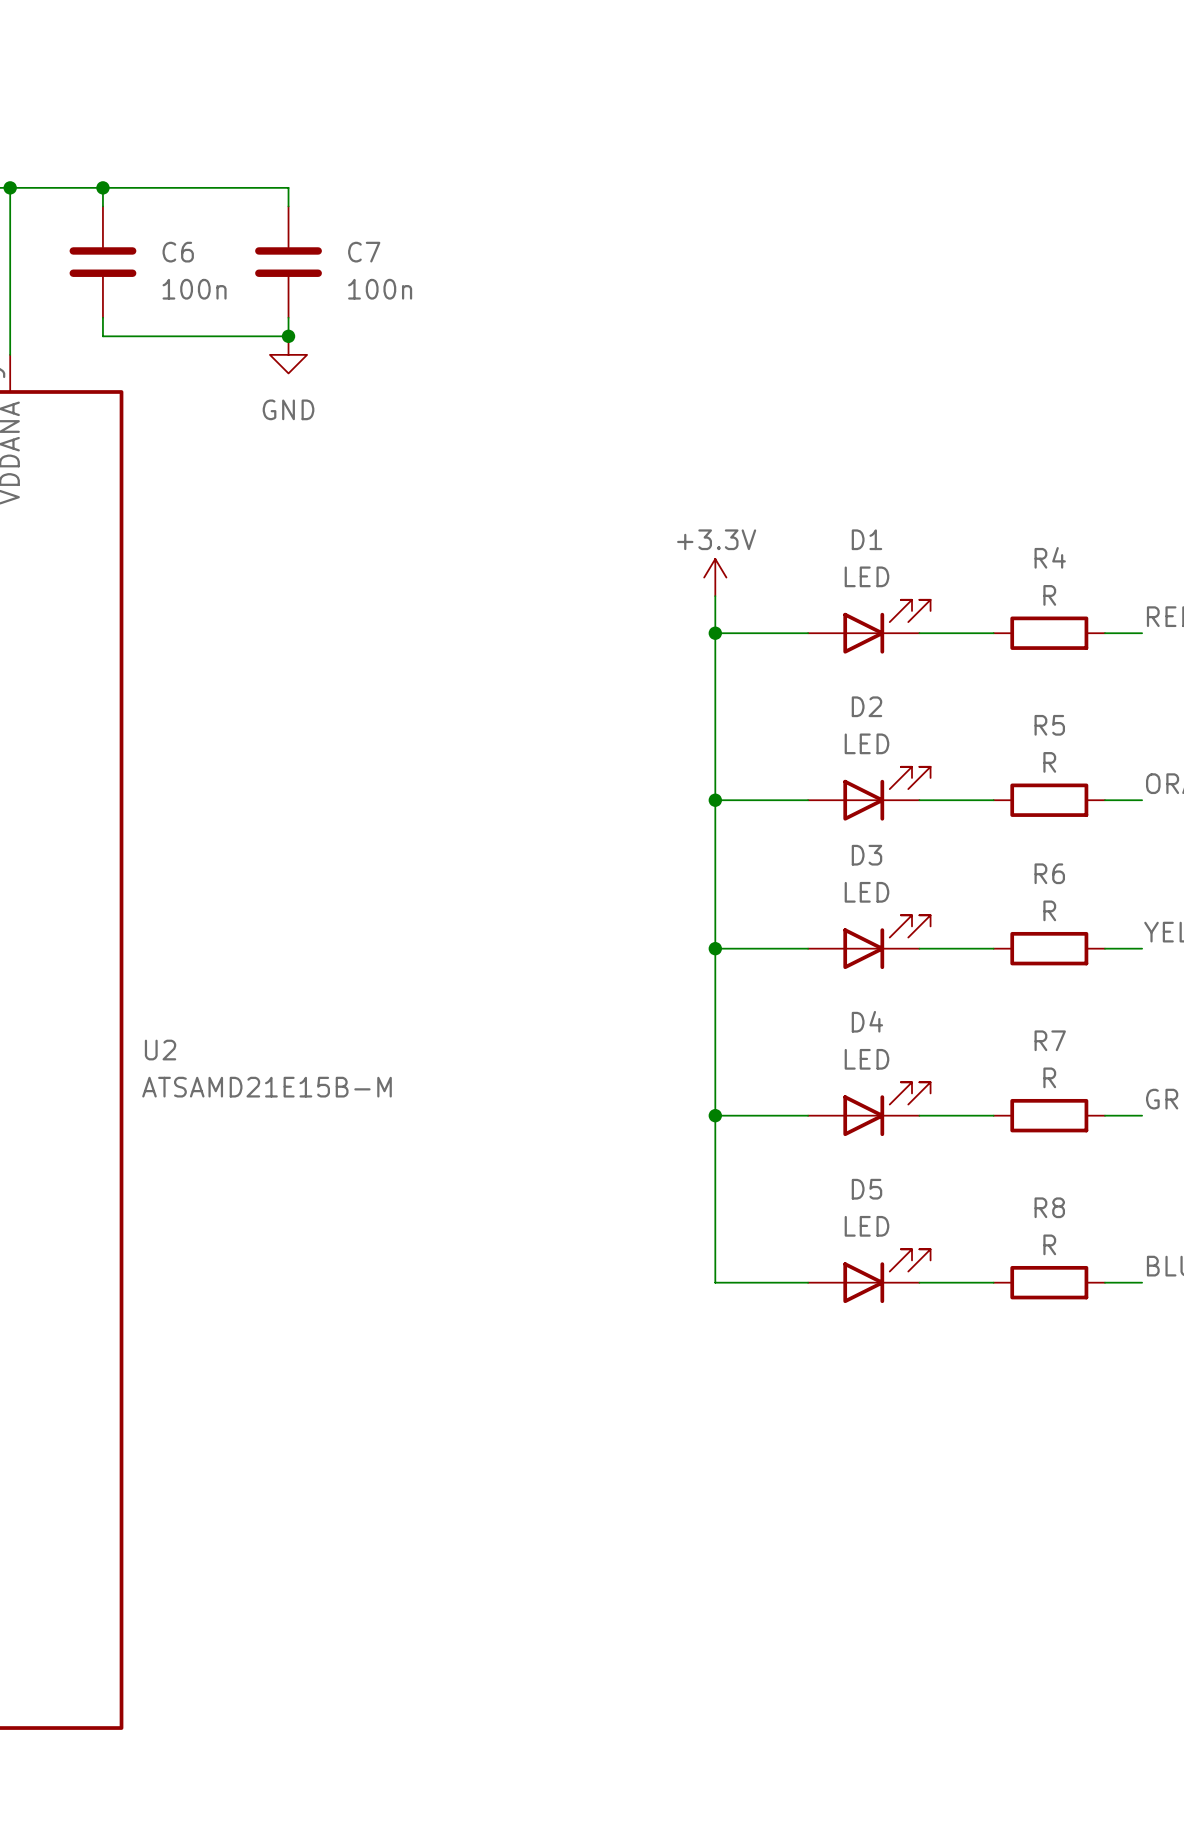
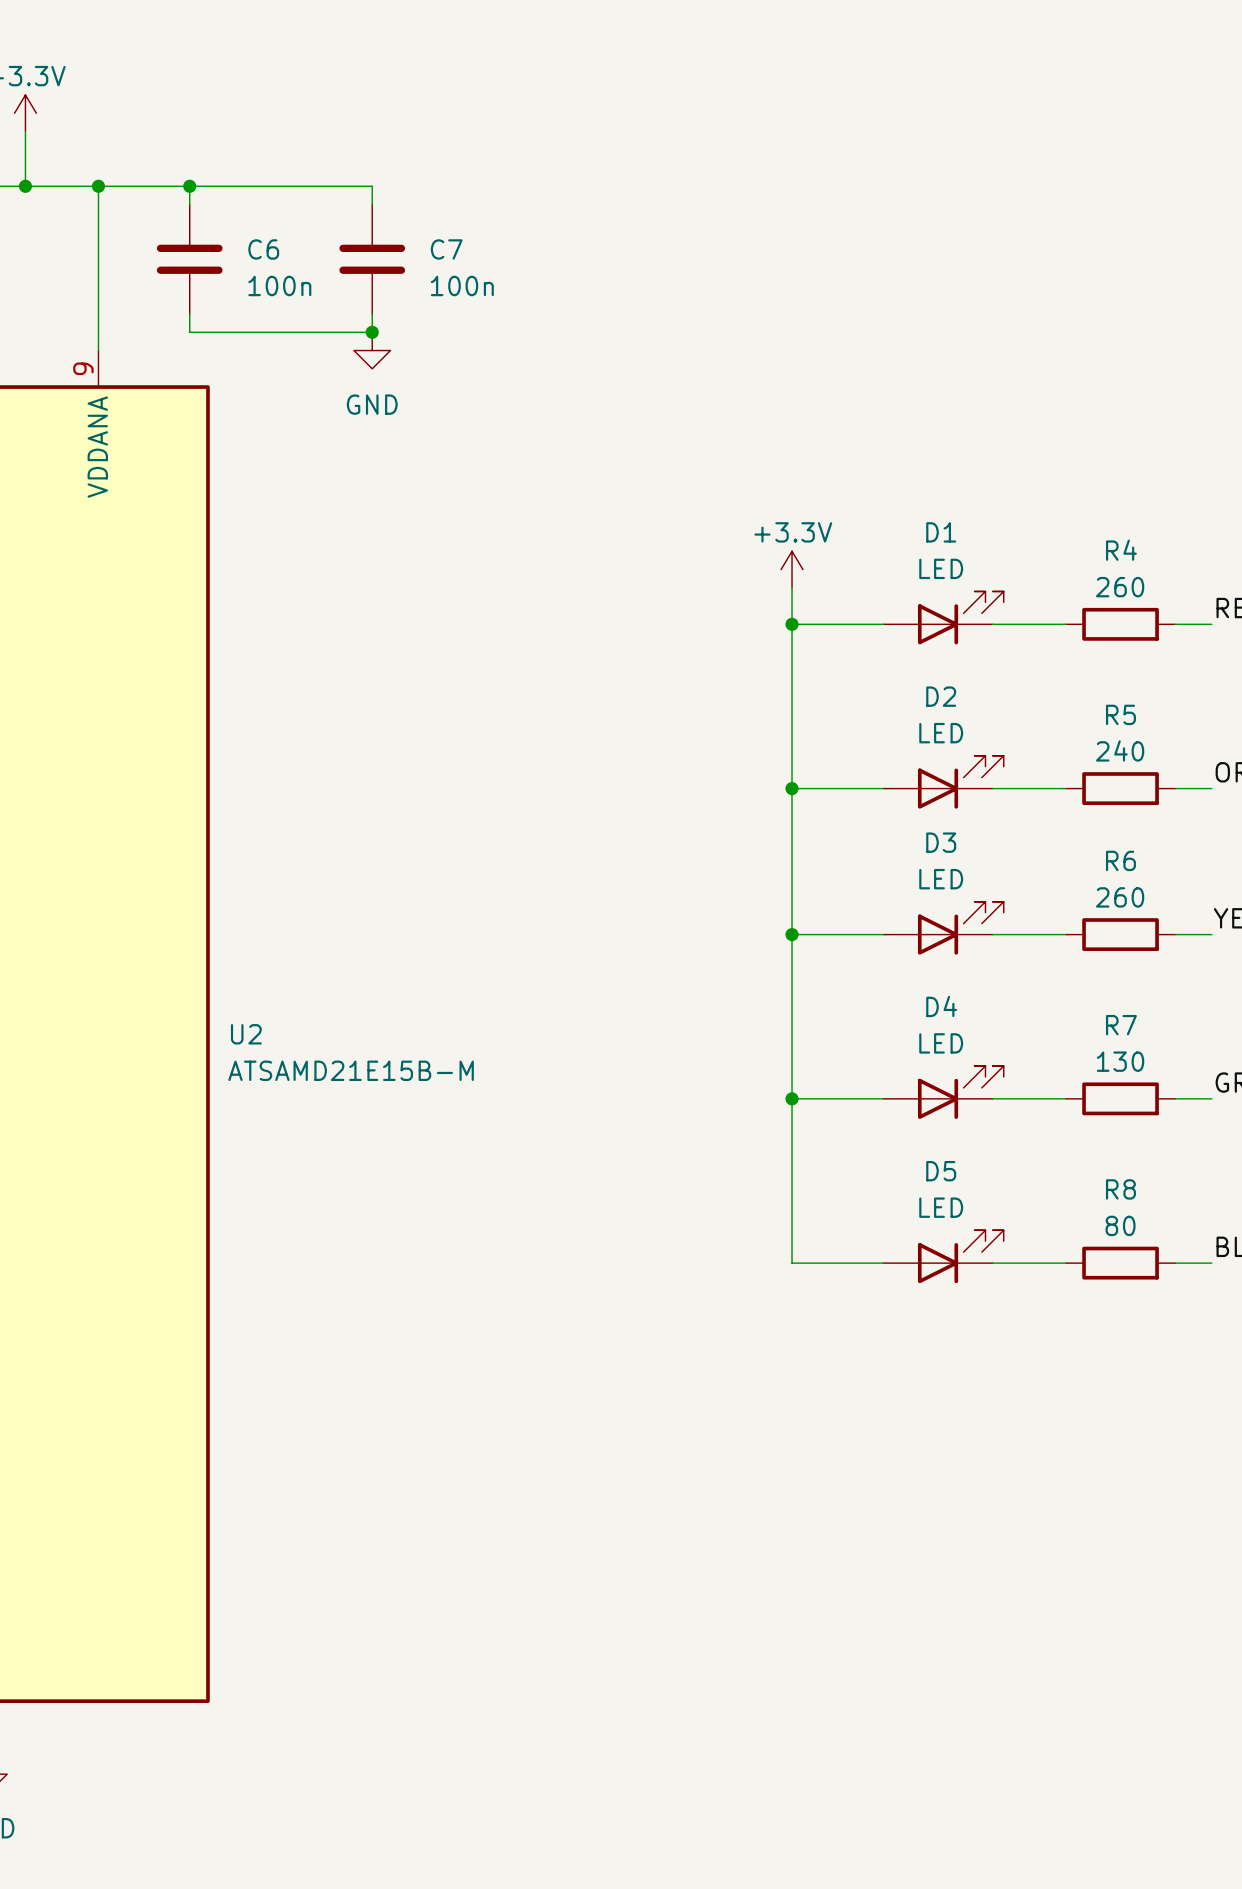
R4 value: R (1049, 595) -> 260 (1120, 587)
R5 value: R (1049, 762) -> 240 (1120, 750)
R6 value: R (1049, 910) -> 260 (1120, 897)
R7 value: R (1049, 1077) -> 130 (1120, 1061)
R8 value: R (1049, 1244) -> 80 (1120, 1225)

